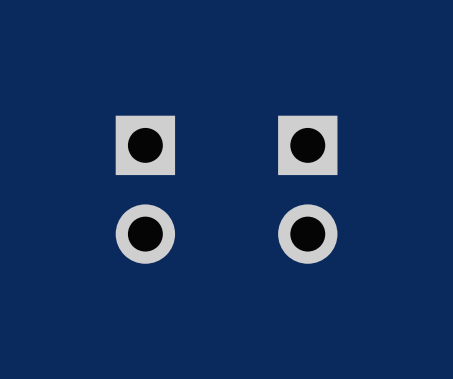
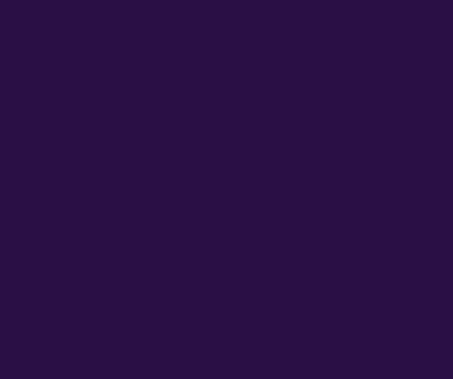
part: (145, 189) -> none
part: (307, 189) -> none

